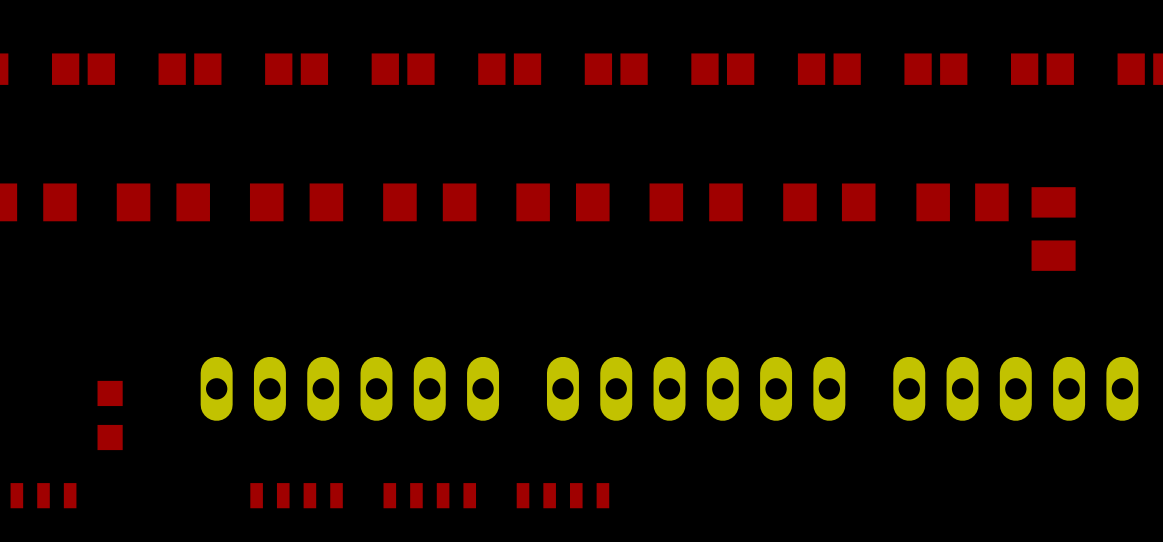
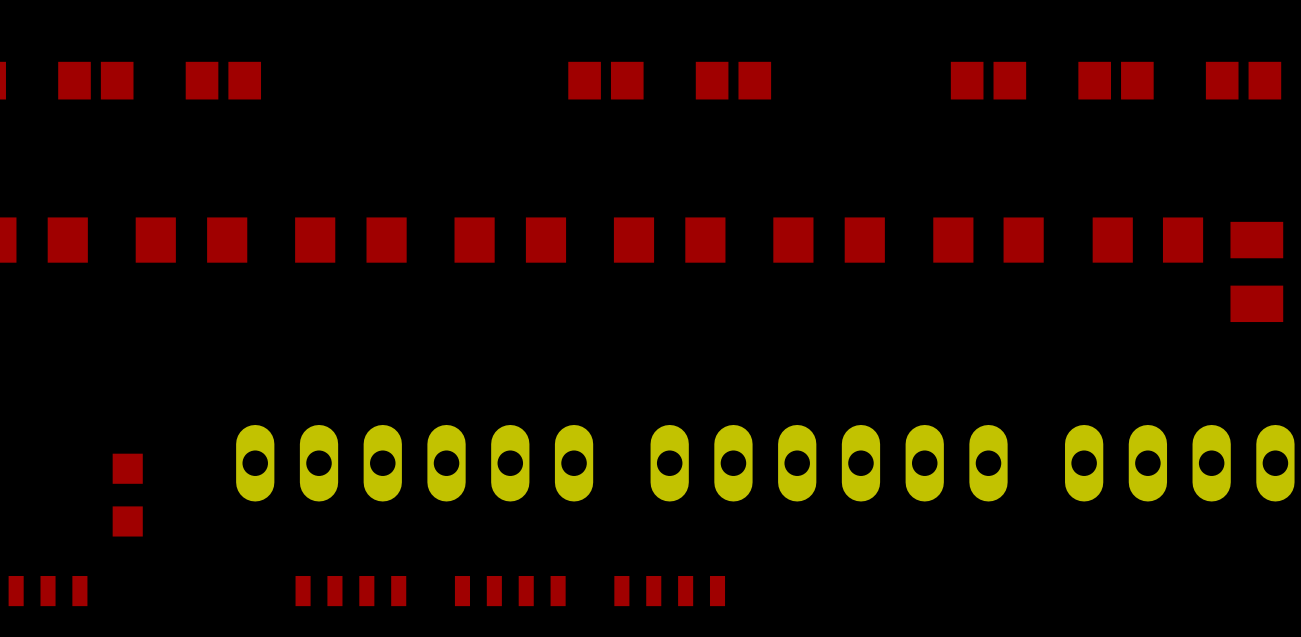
part: (296, 69) -> none
part: (403, 69) -> none
part: (722, 69) -> none

